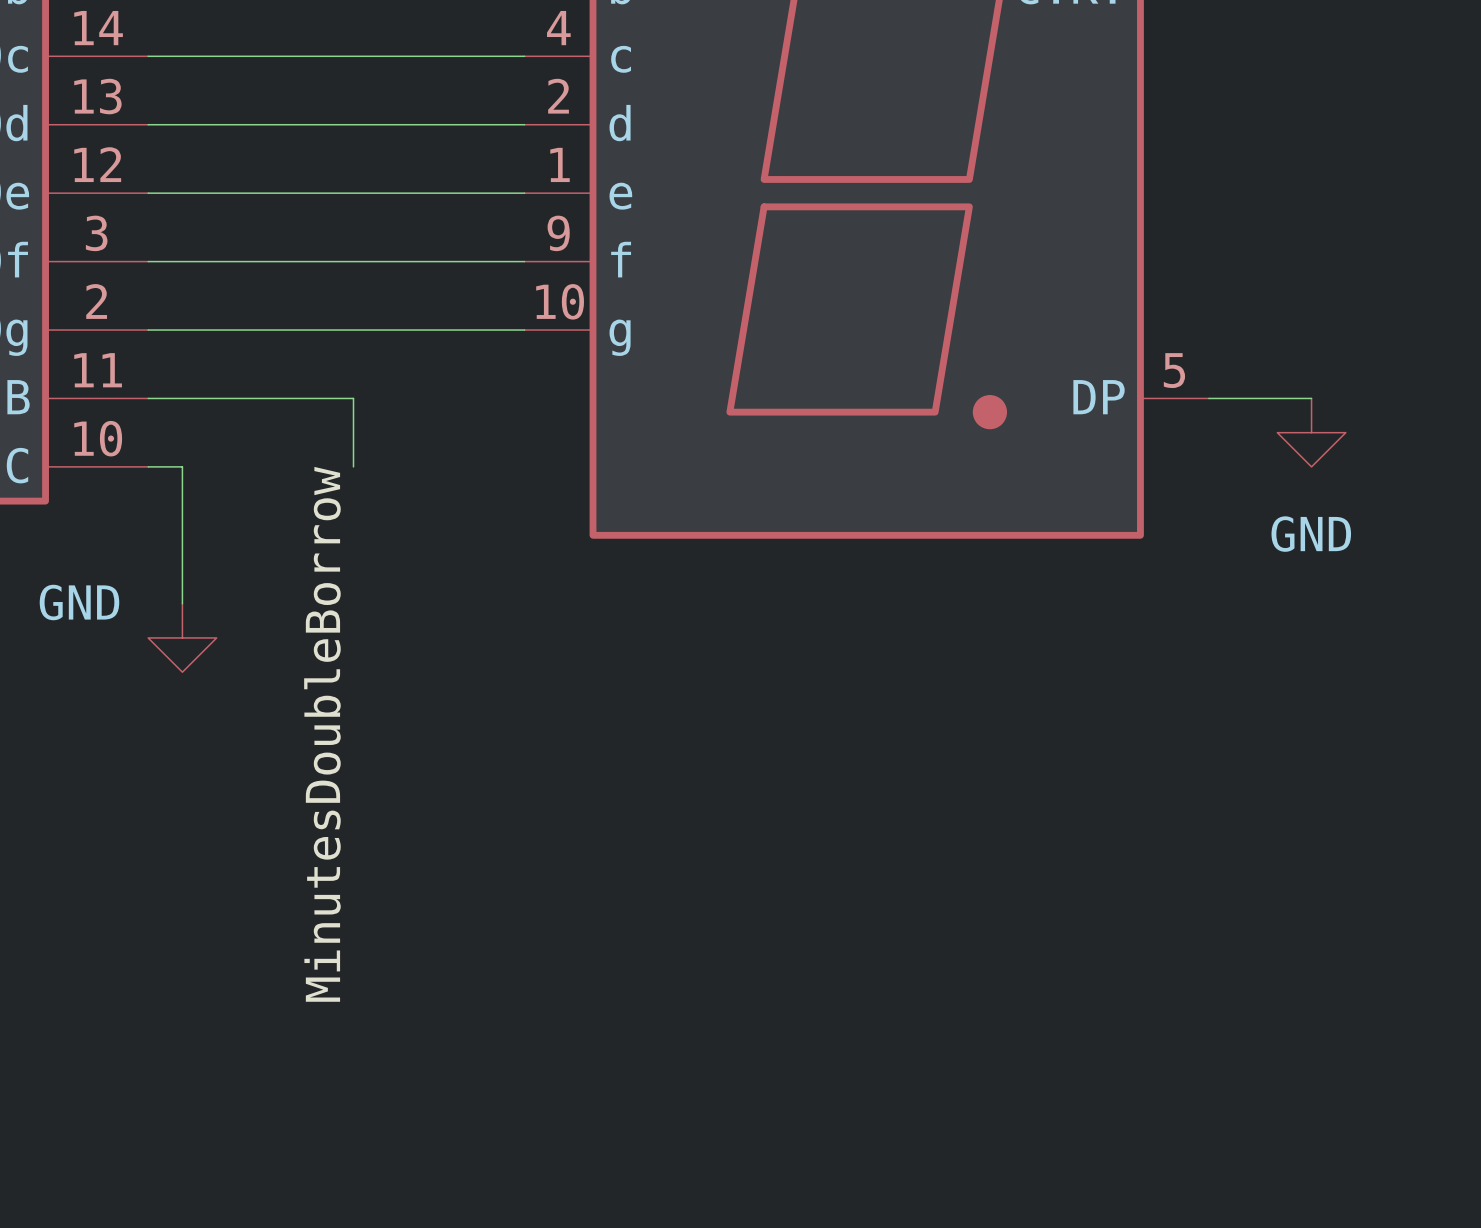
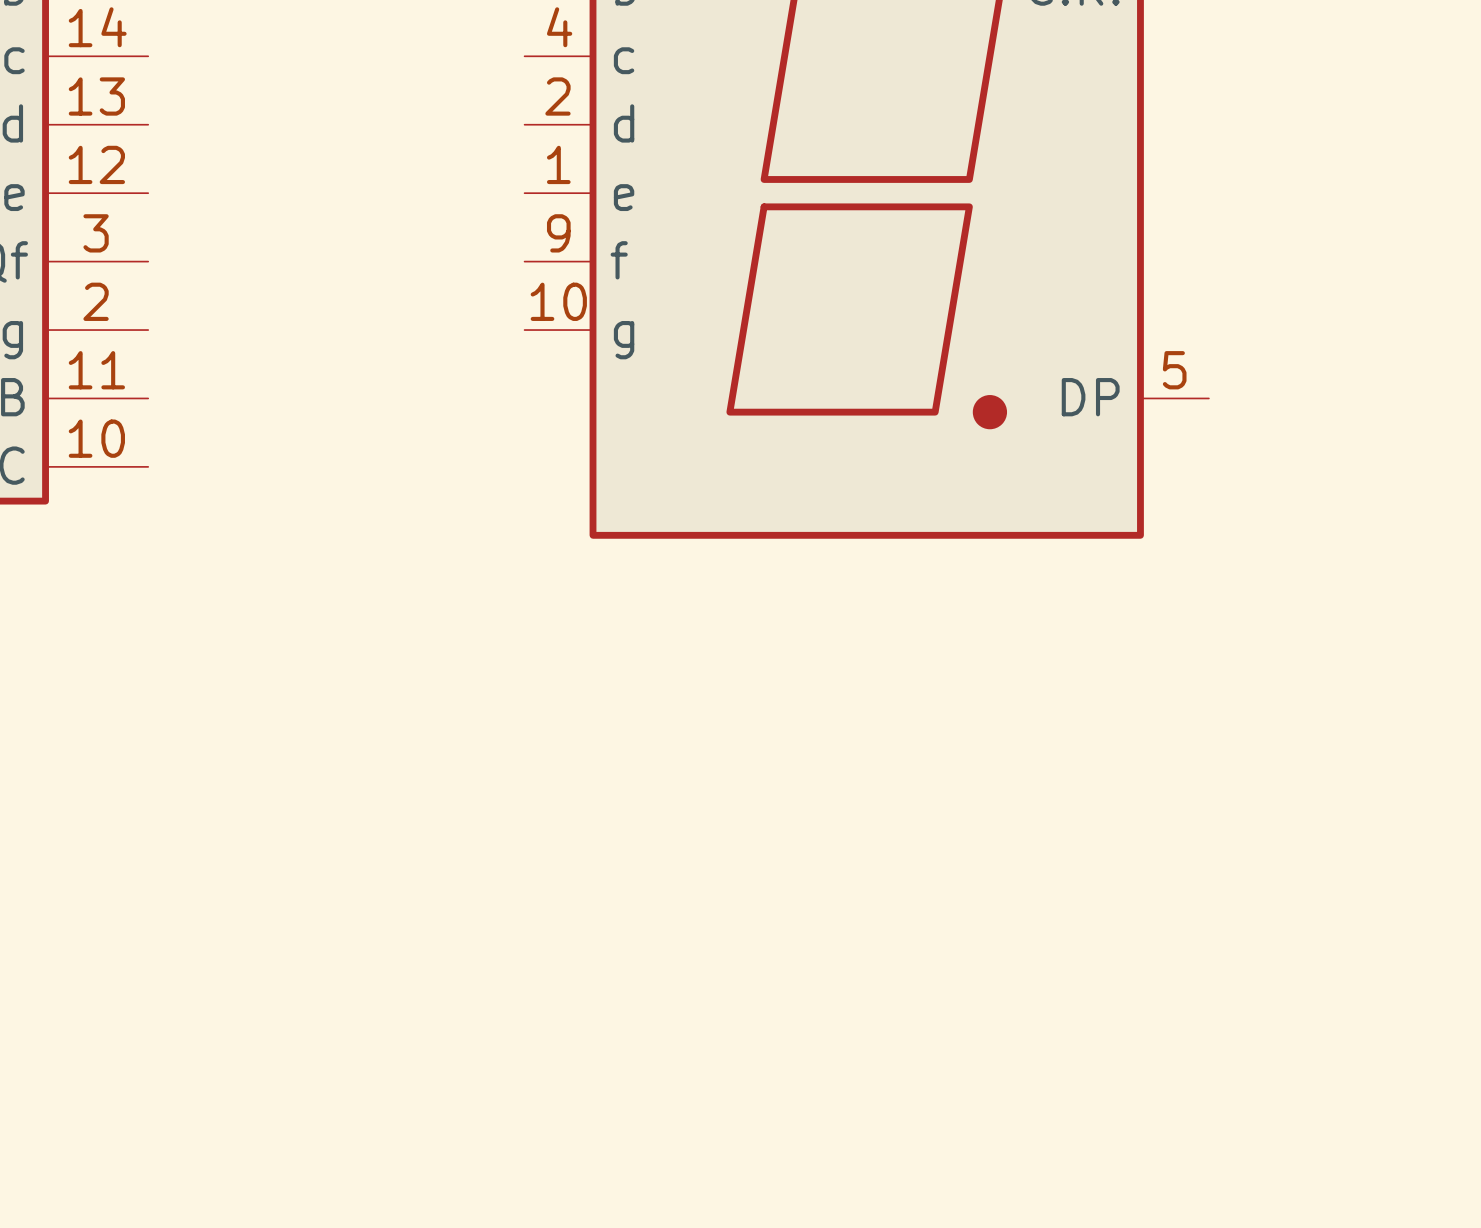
wire: (148, 56) (524, 56) -> none
wire: (148, 124) (524, 124) -> none
wire: (148, 193) (524, 193) -> none
wire: (148, 261) (524, 261) -> none
wire: (148, 330) (524, 330) -> none
wire: (148, 398) (353, 398) (353, 466) -> none
wire: (1208, 398) (1311, 398) -> none
power symbol: GND (1311, 432) -> none
wire: (148, 466) (182, 466) (182, 603) -> none
power symbol: GND (182, 637) -> none
label: MinutesDoubleBorrow (322, 734) -> none

